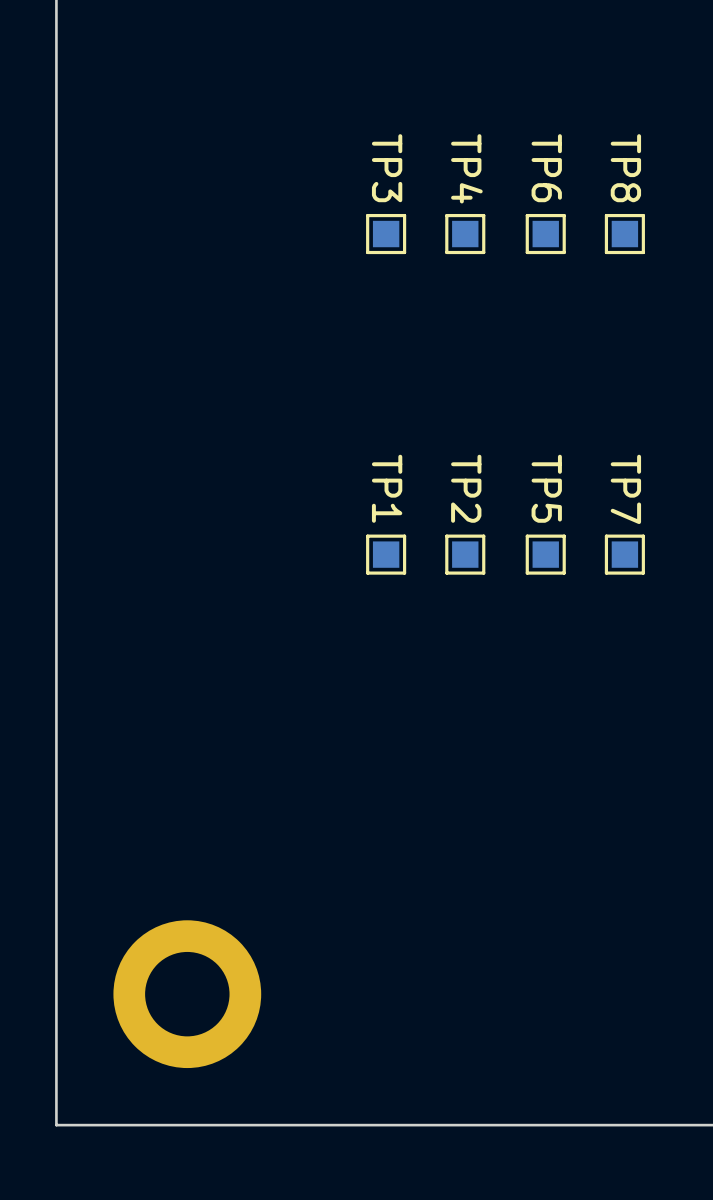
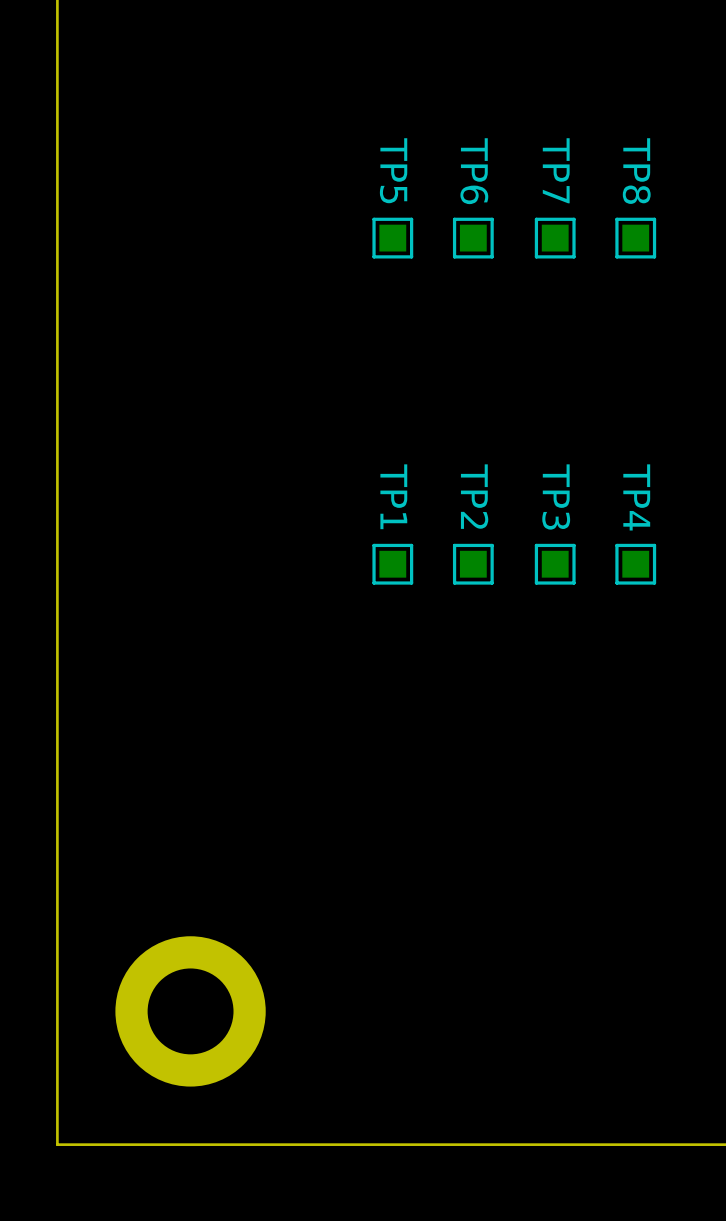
TP3 name: TP3 (387, 168) -> TP5 (393, 170)
TP4 name: TP4 (466, 168) -> TP6 (474, 171)
TP6 name: TP6 (546, 168) -> TP7 (556, 170)
TP5 name: TP5 (546, 488) -> TP3 (556, 496)
TP7 name: TP7 (625, 489) -> TP4 (636, 497)

